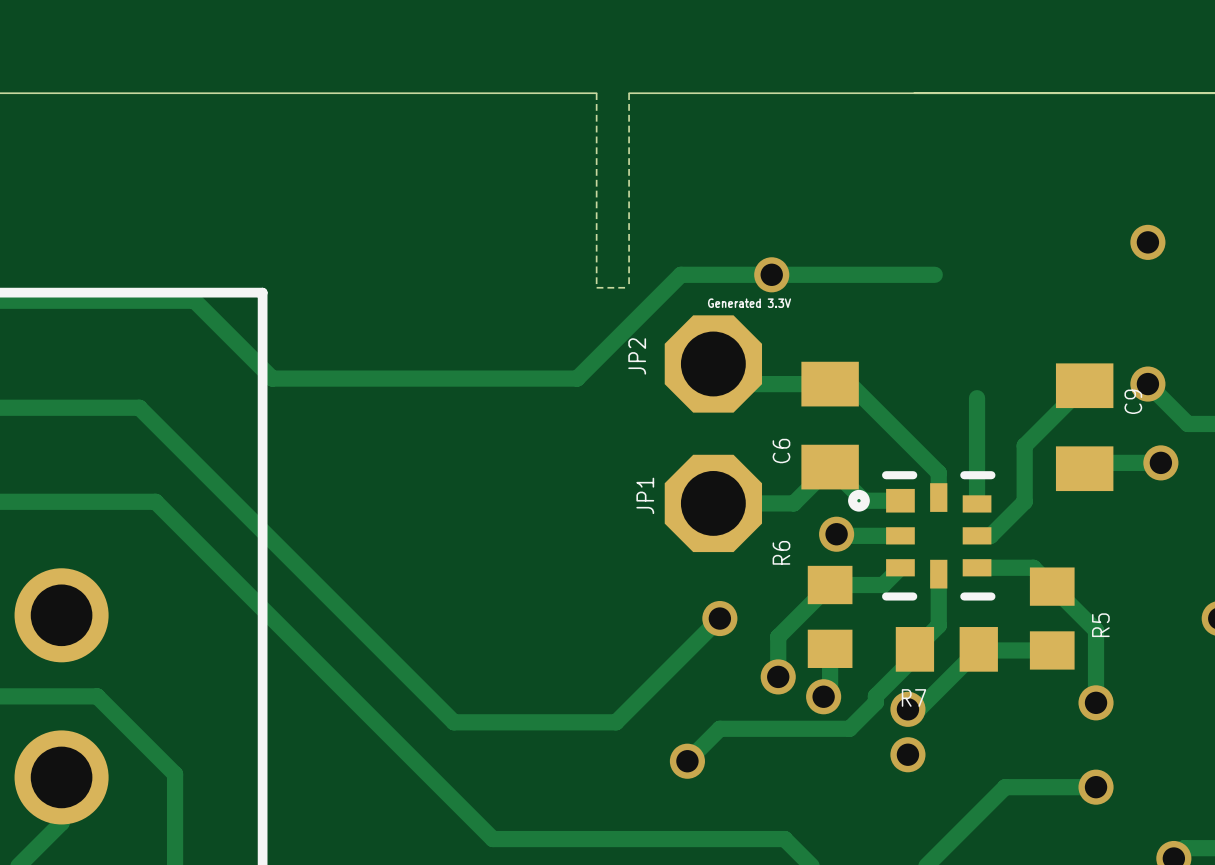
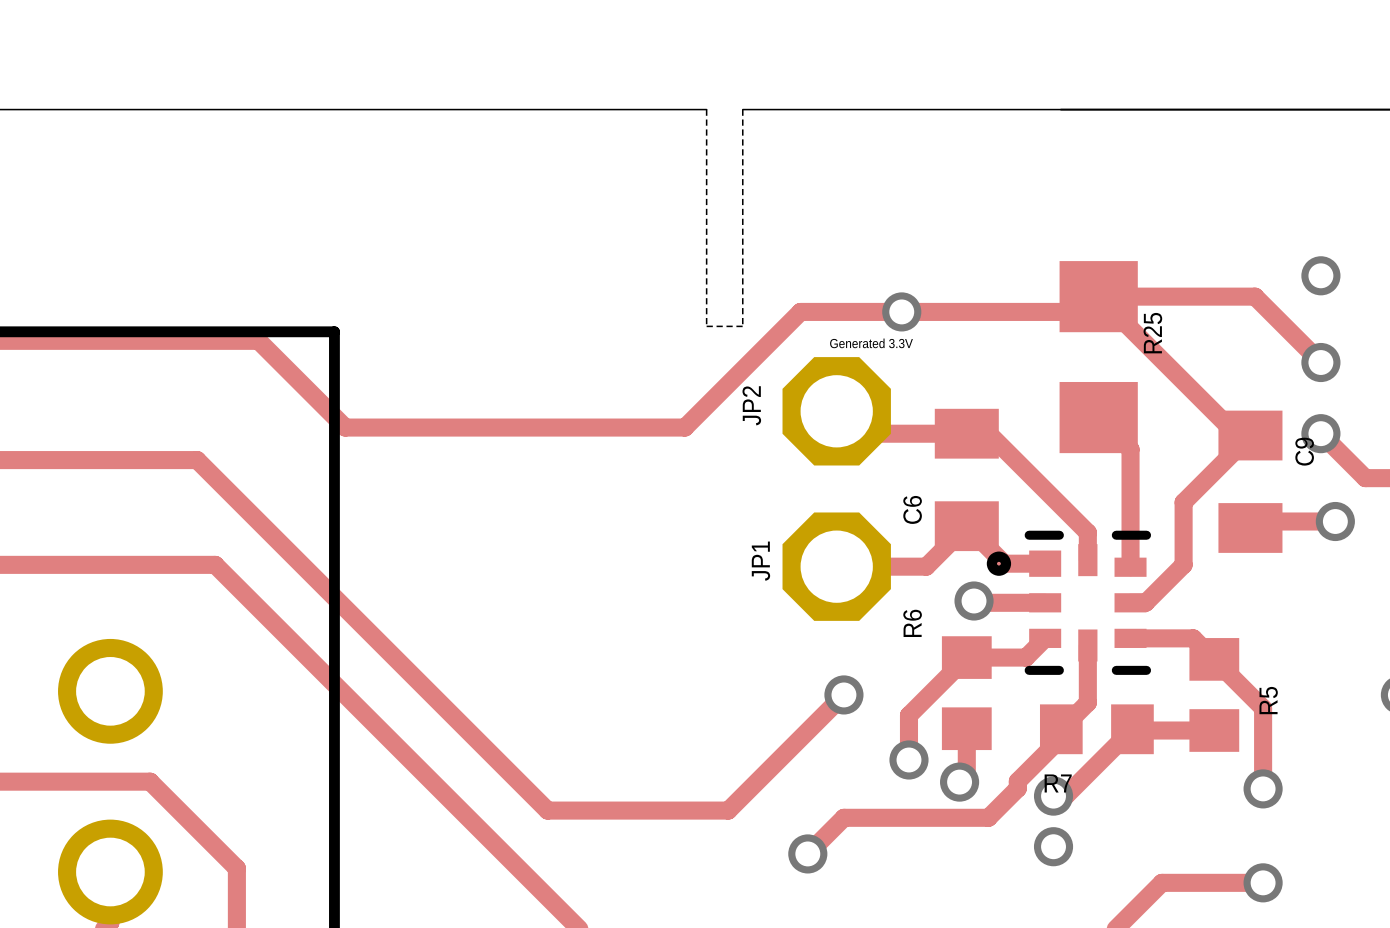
track: none -> (1098, 296) (1237, 435)
track: none -> (1098, 296) (1255, 296) (1320, 362)
R25: none -> (1098, 357)
via: none -> (1320, 362)

